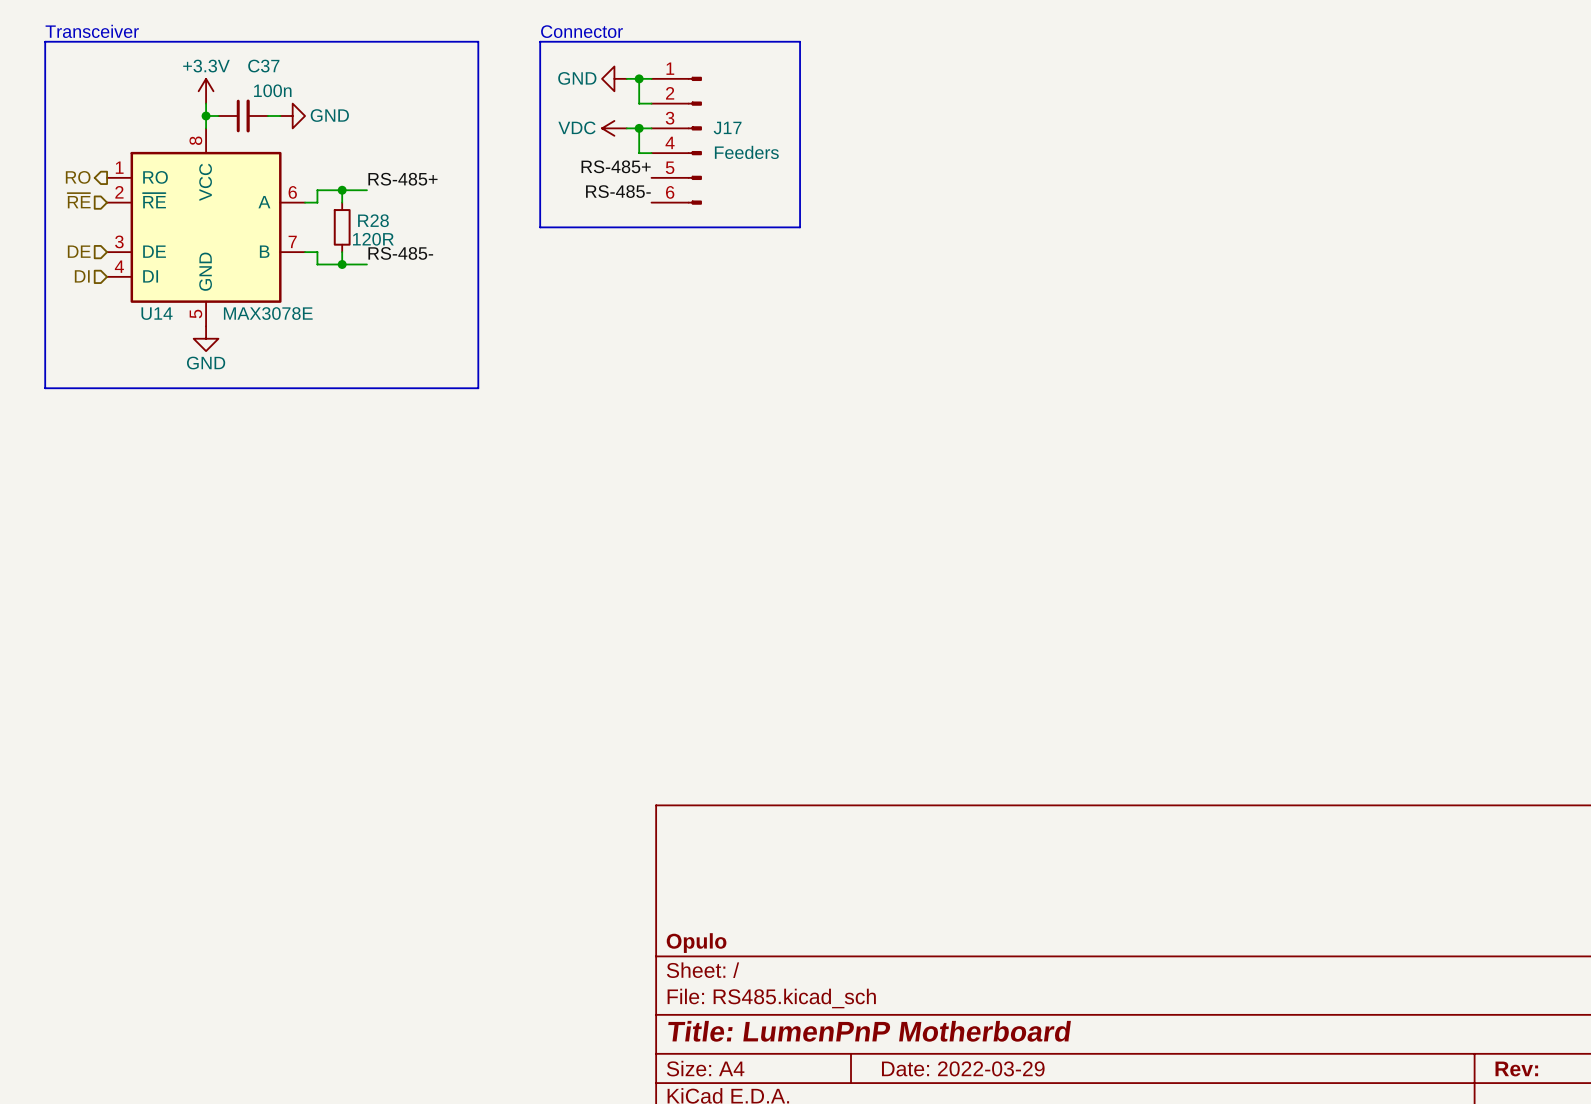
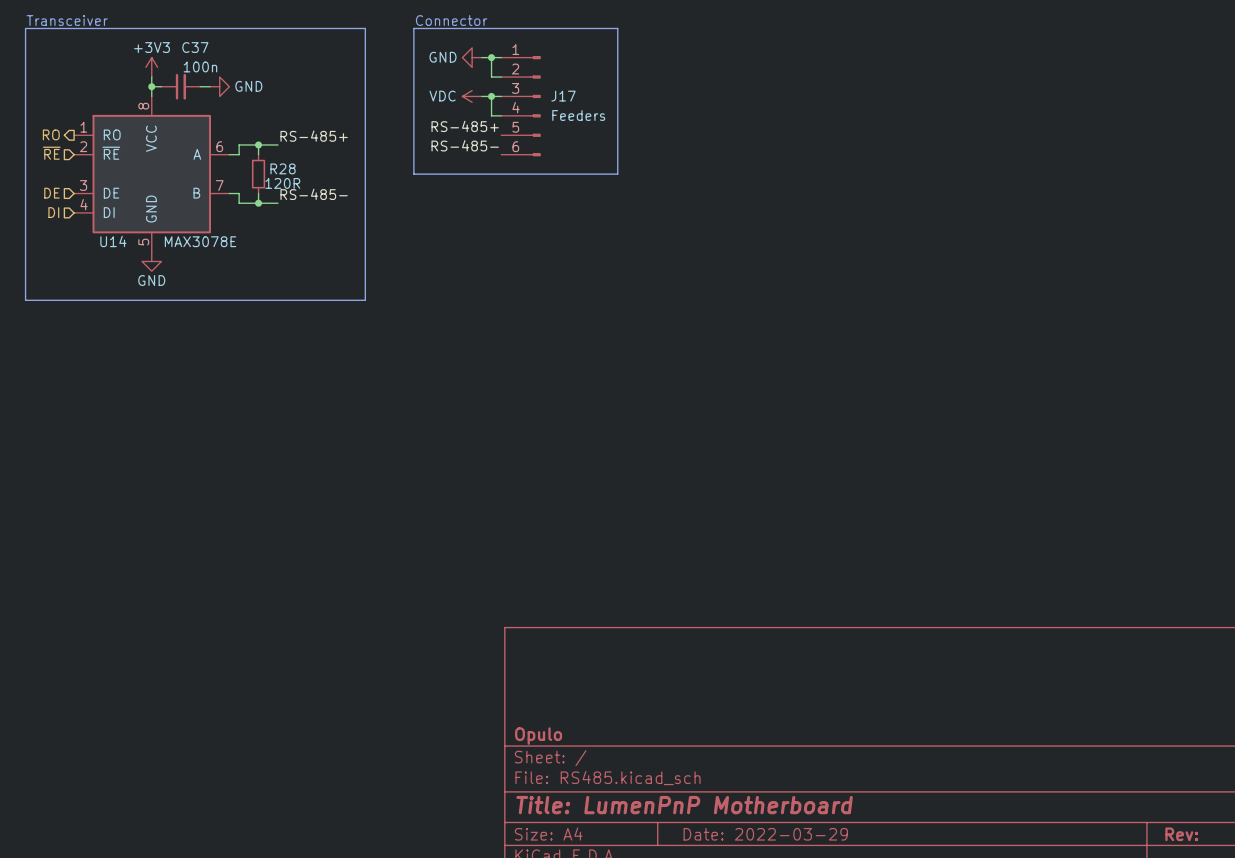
power symbol: +3.3V (206, 91) -> +3V3 (151, 67)

